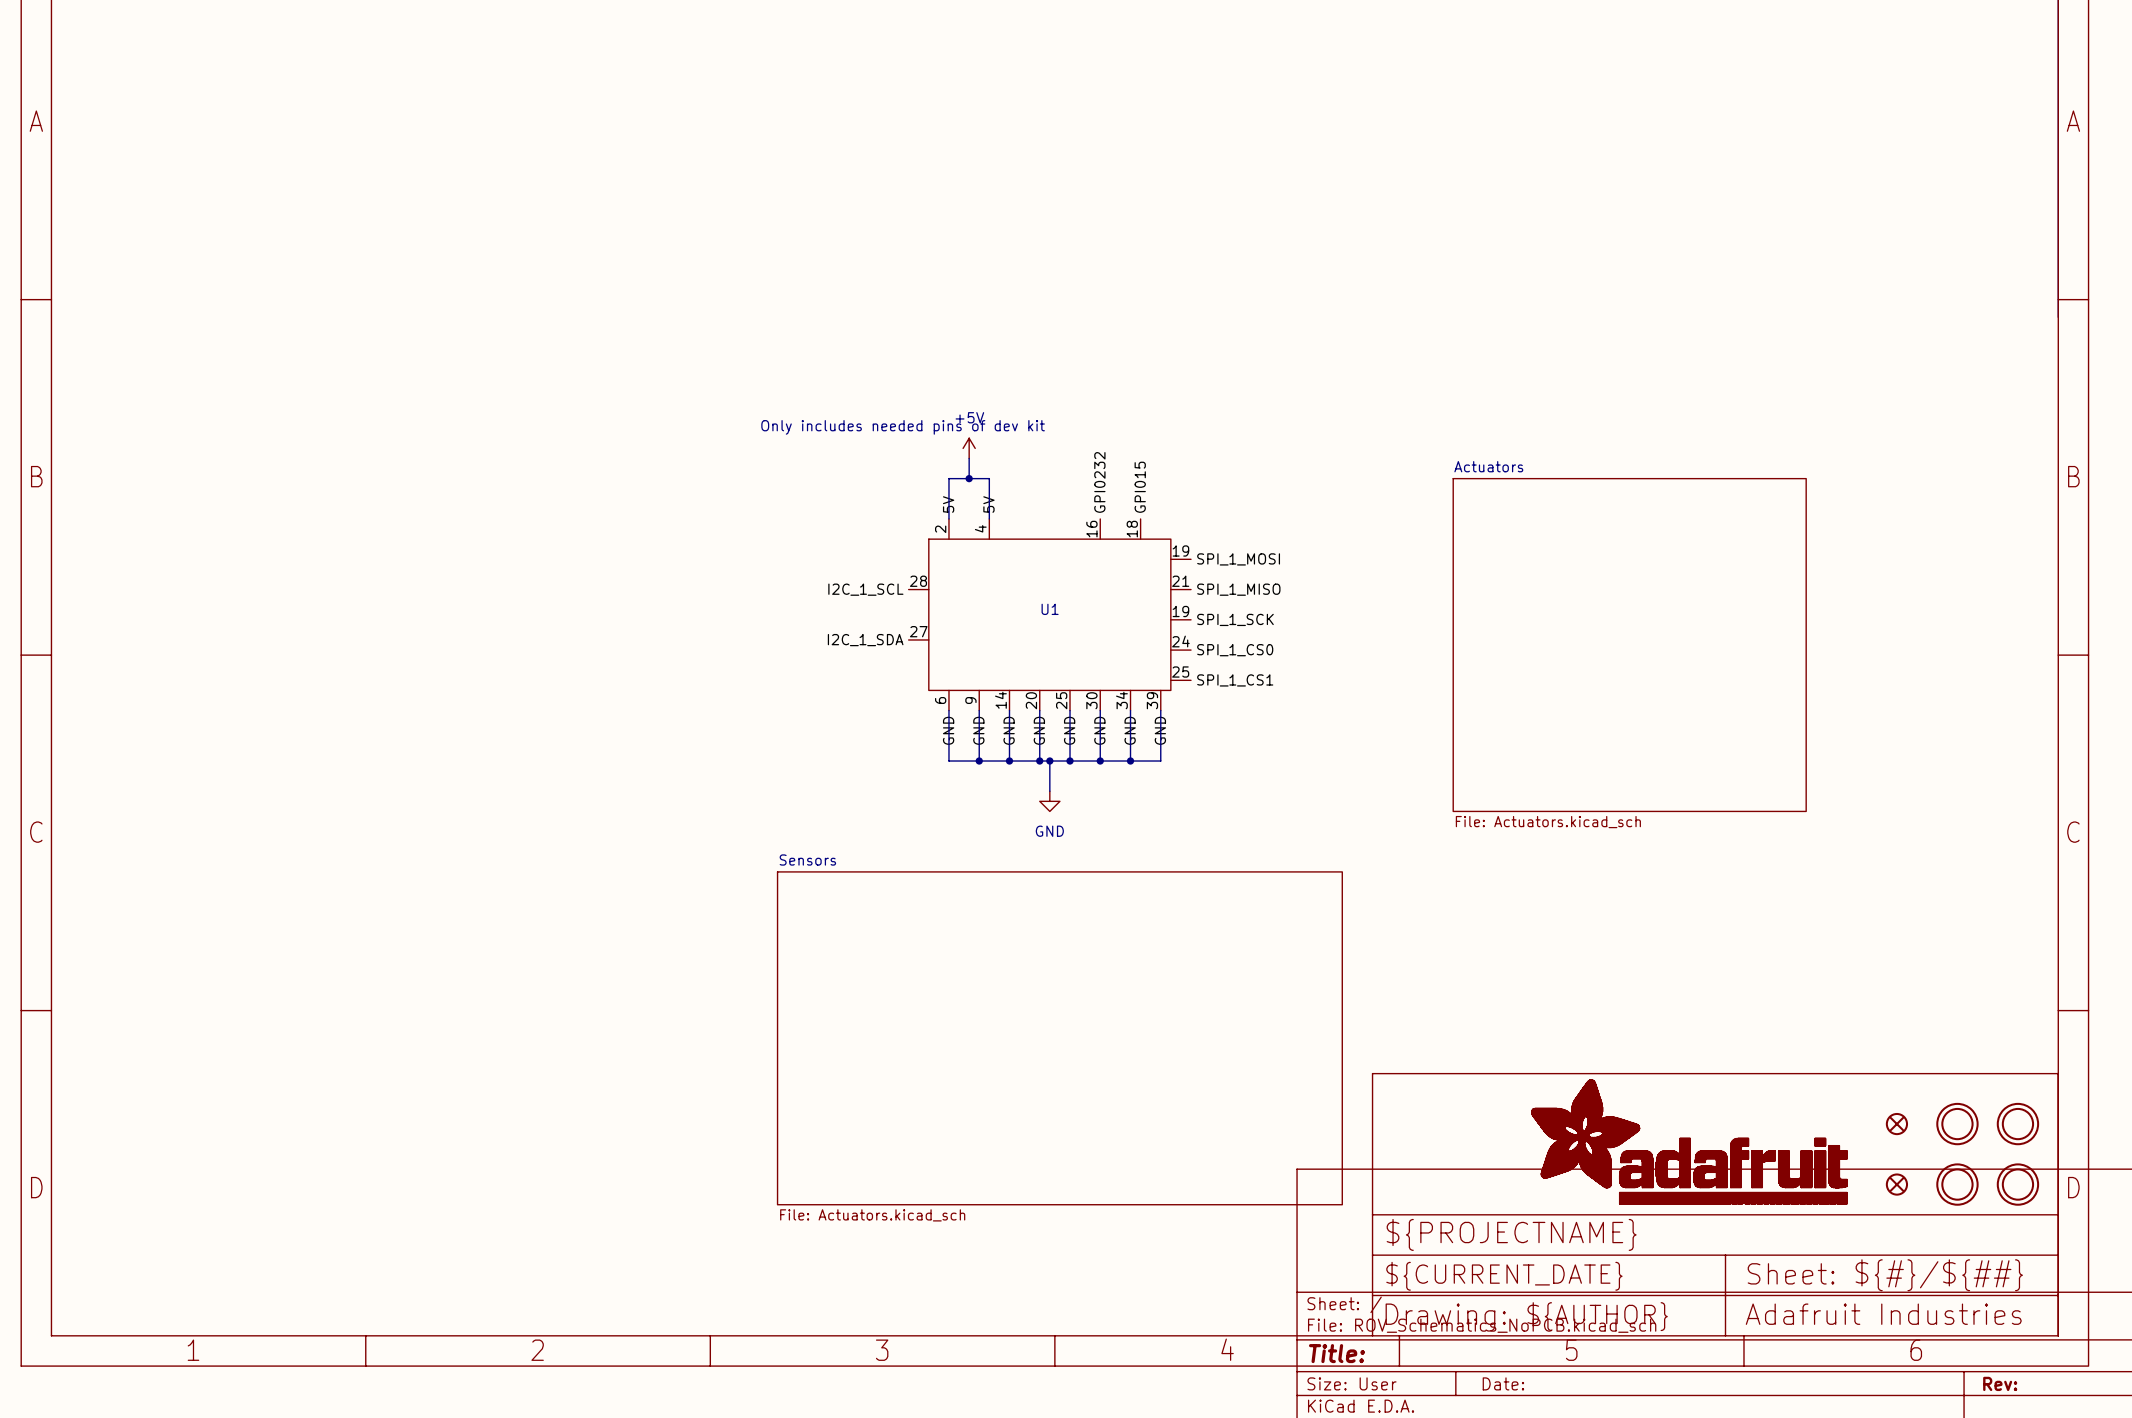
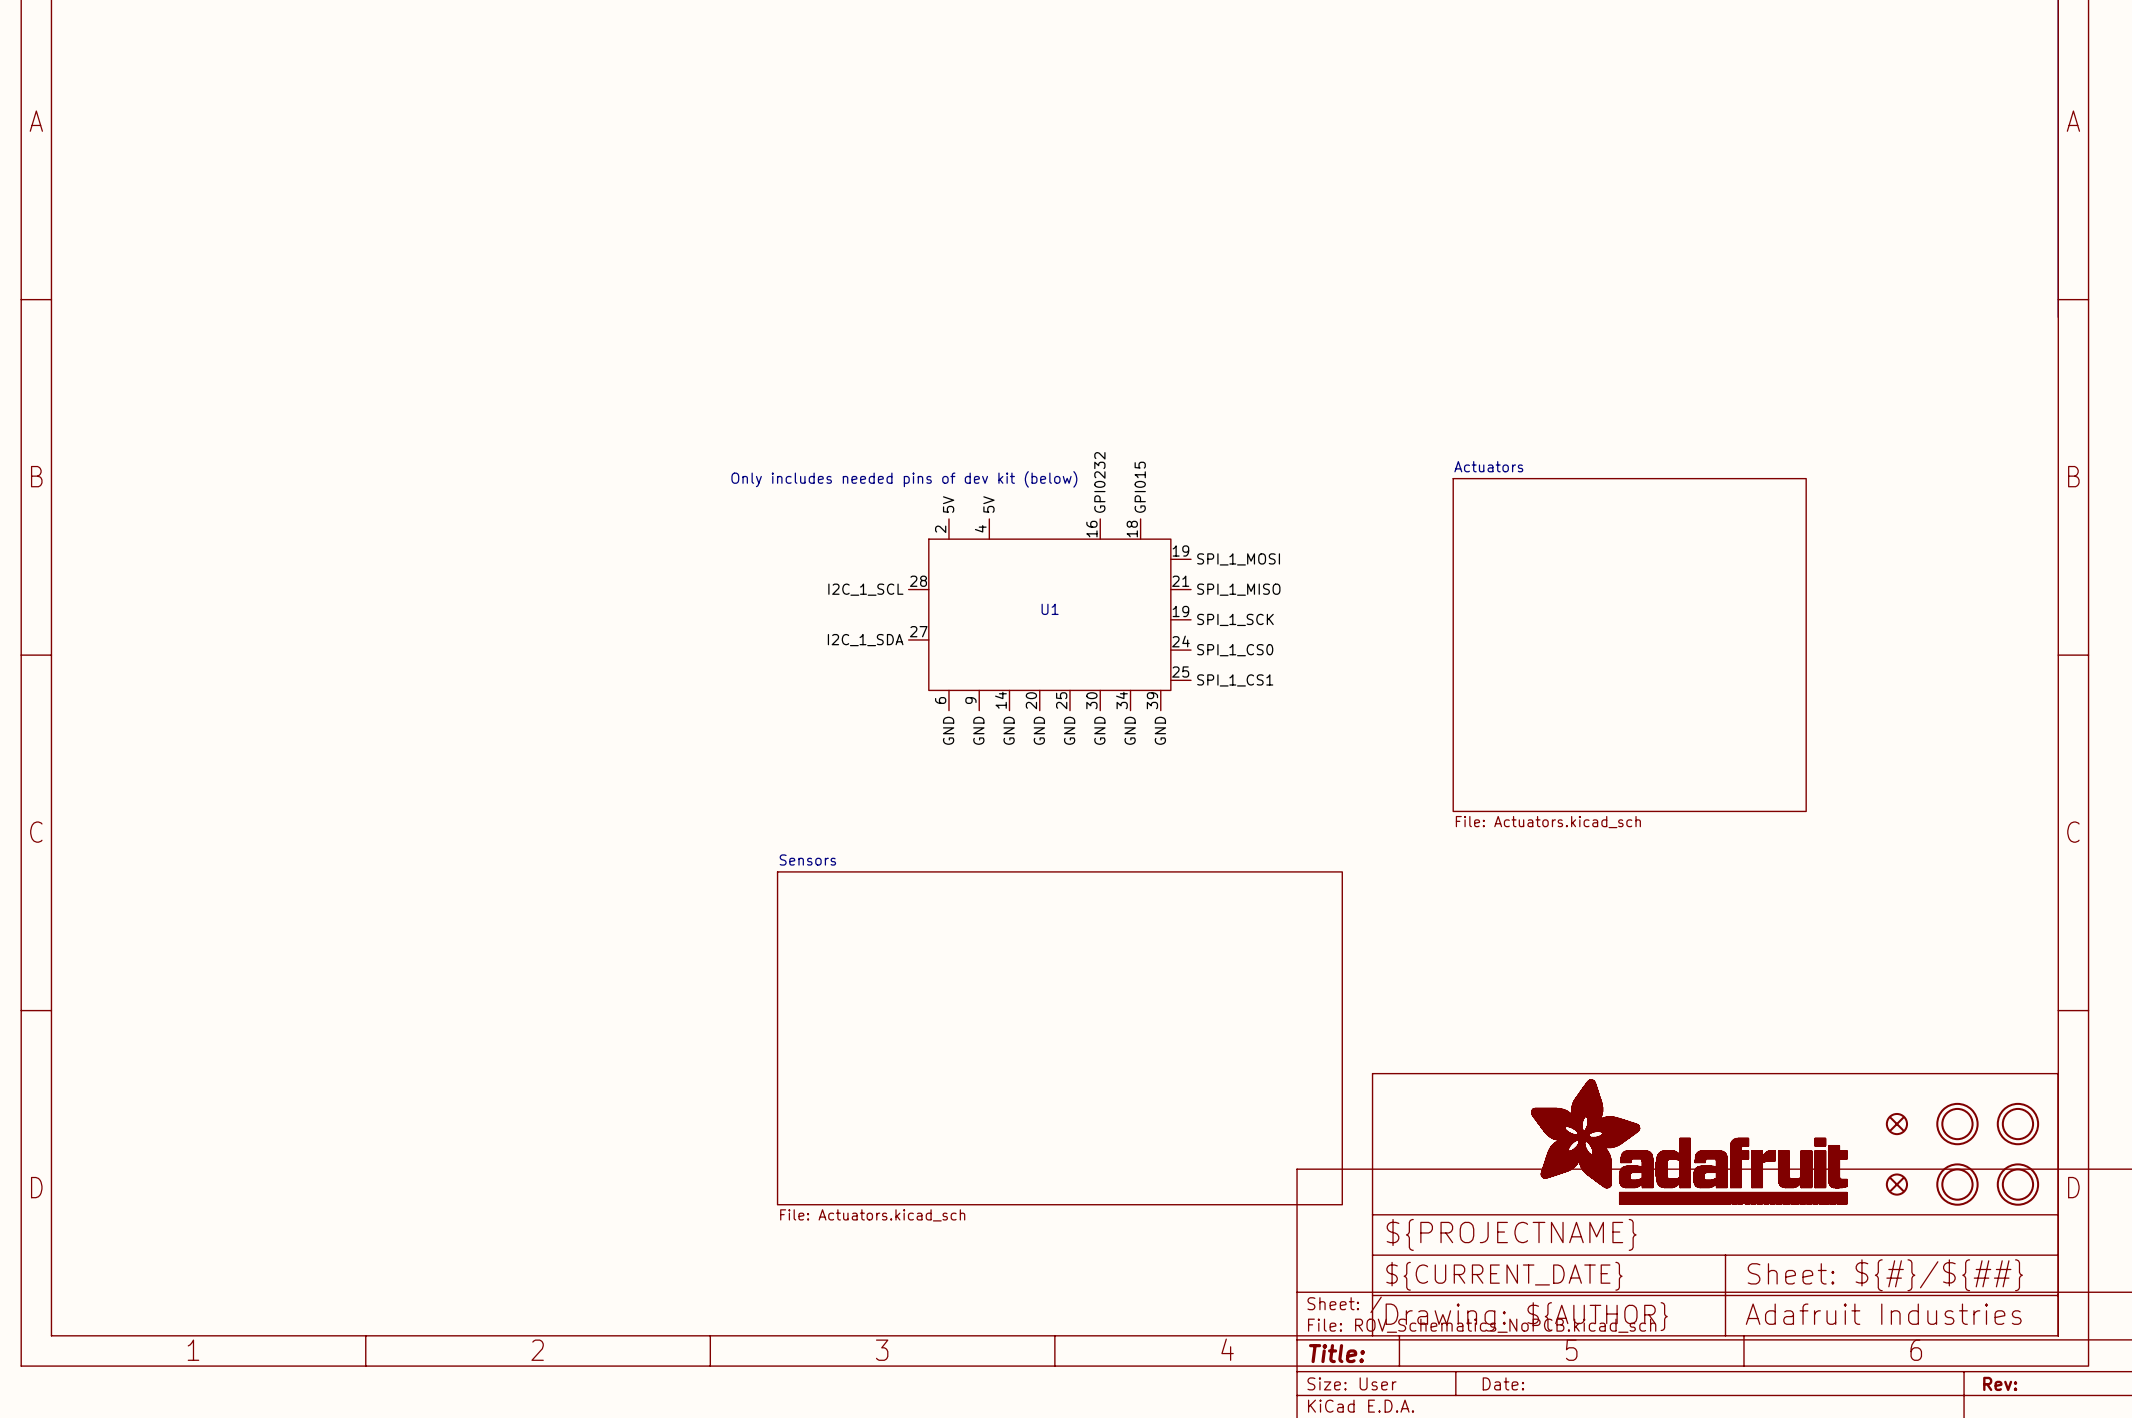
text: Only includes needed pins of dev kit (903, 427) -> none
power symbol: +5V (969, 448) -> none
wire: (969, 458) (969, 478) -> none
junction: (969, 478) -> none
text: none -> Only includes needed pins of dev kit (below) (904, 479)
wire: (948, 518) (948, 478) (989, 478) (989, 518) -> none
wire: (948, 710) (948, 761) (1160, 761) (1160, 710) -> none
wire: (979, 710) (979, 761) -> none
wire: (1009, 710) (1009, 761) -> none
wire: (1039, 710) (1039, 761) -> none
wire: (1070, 710) (1070, 761) -> none
wire: (1100, 710) (1100, 761) -> none
wire: (1130, 710) (1130, 761) -> none
junction: (979, 761) -> none
junction: (1009, 761) -> none
junction: (1039, 761) -> none
wire: (1049, 761) (1049, 791) -> none
junction: (1049, 761) -> none
junction: (1070, 761) -> none
junction: (1100, 761) -> none
junction: (1130, 761) -> none
power symbol: GND (1049, 801) -> none

